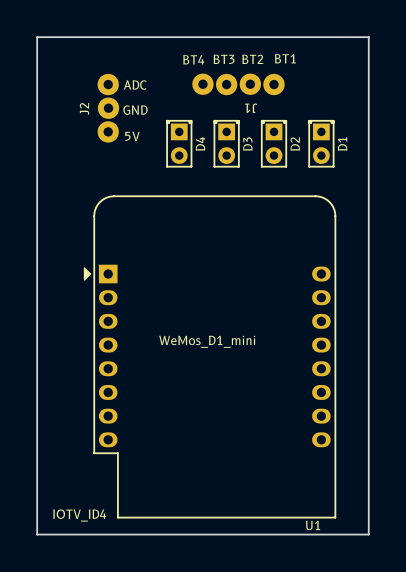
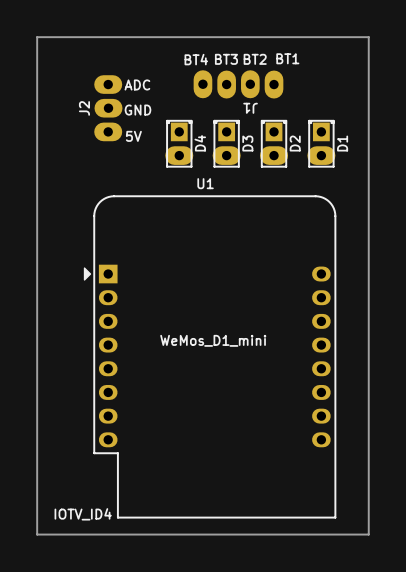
J2 footprint: [97, 73, 120, 143] -> [94, 75, 123, 142]
J1 footprint: [192, 73, 285, 96] -> [193, 70, 284, 99]
D4 footprint: [166, 120, 193, 168] -> [165, 120, 194, 168]
D3 footprint: [213, 120, 240, 168] -> [212, 120, 241, 168]
D2 footprint: [261, 120, 287, 168] -> [260, 120, 289, 168]
D1 footprint: [308, 120, 335, 168] -> [307, 120, 336, 168]
U1 name position: U1 (313, 525) -> U1 (205, 183)

